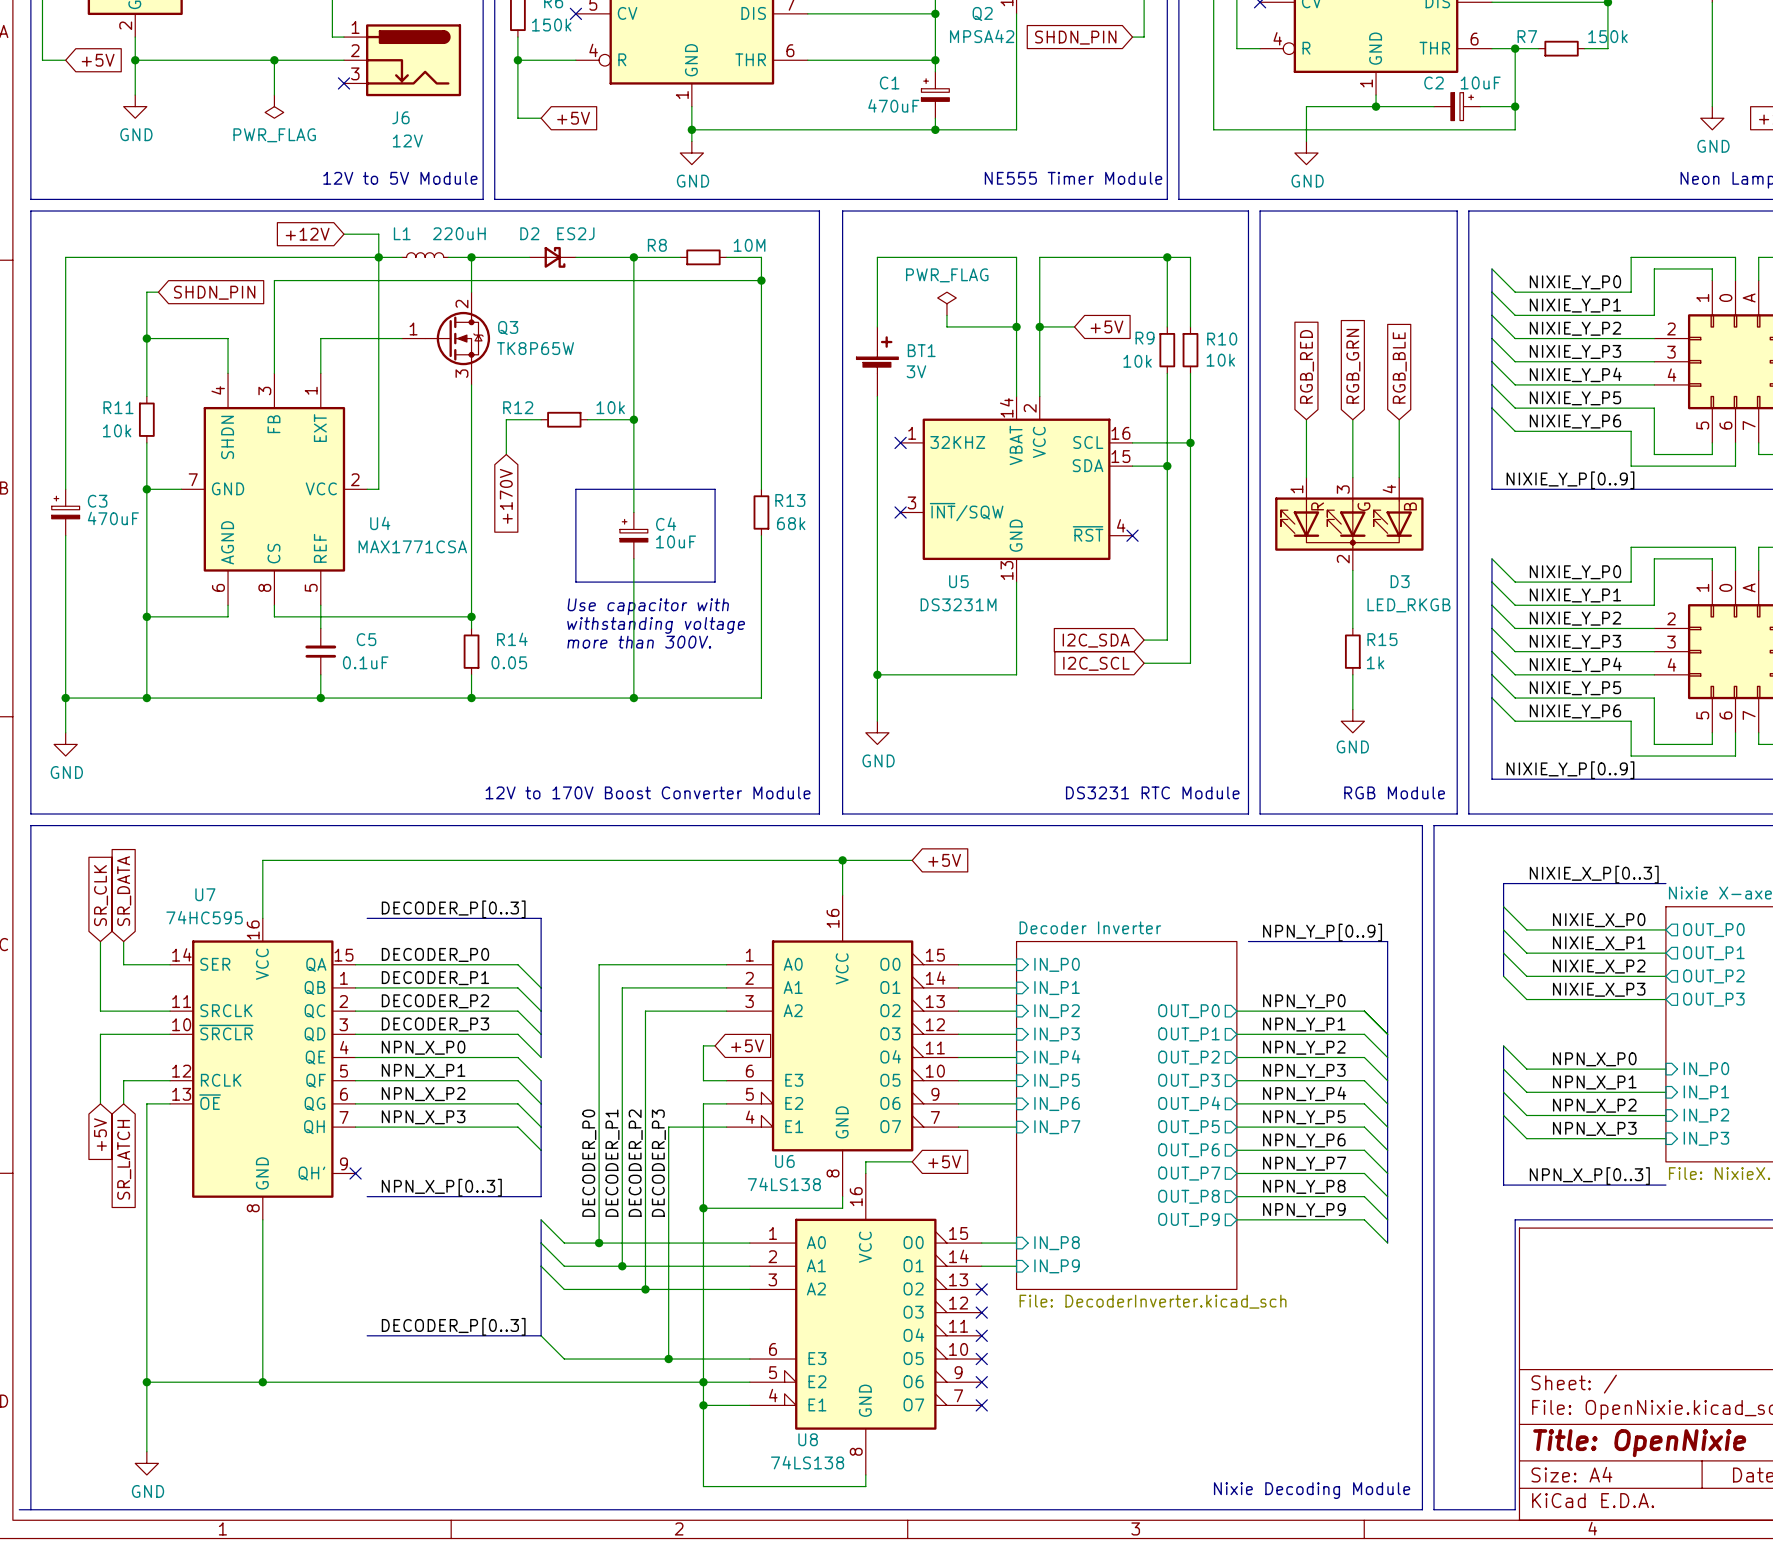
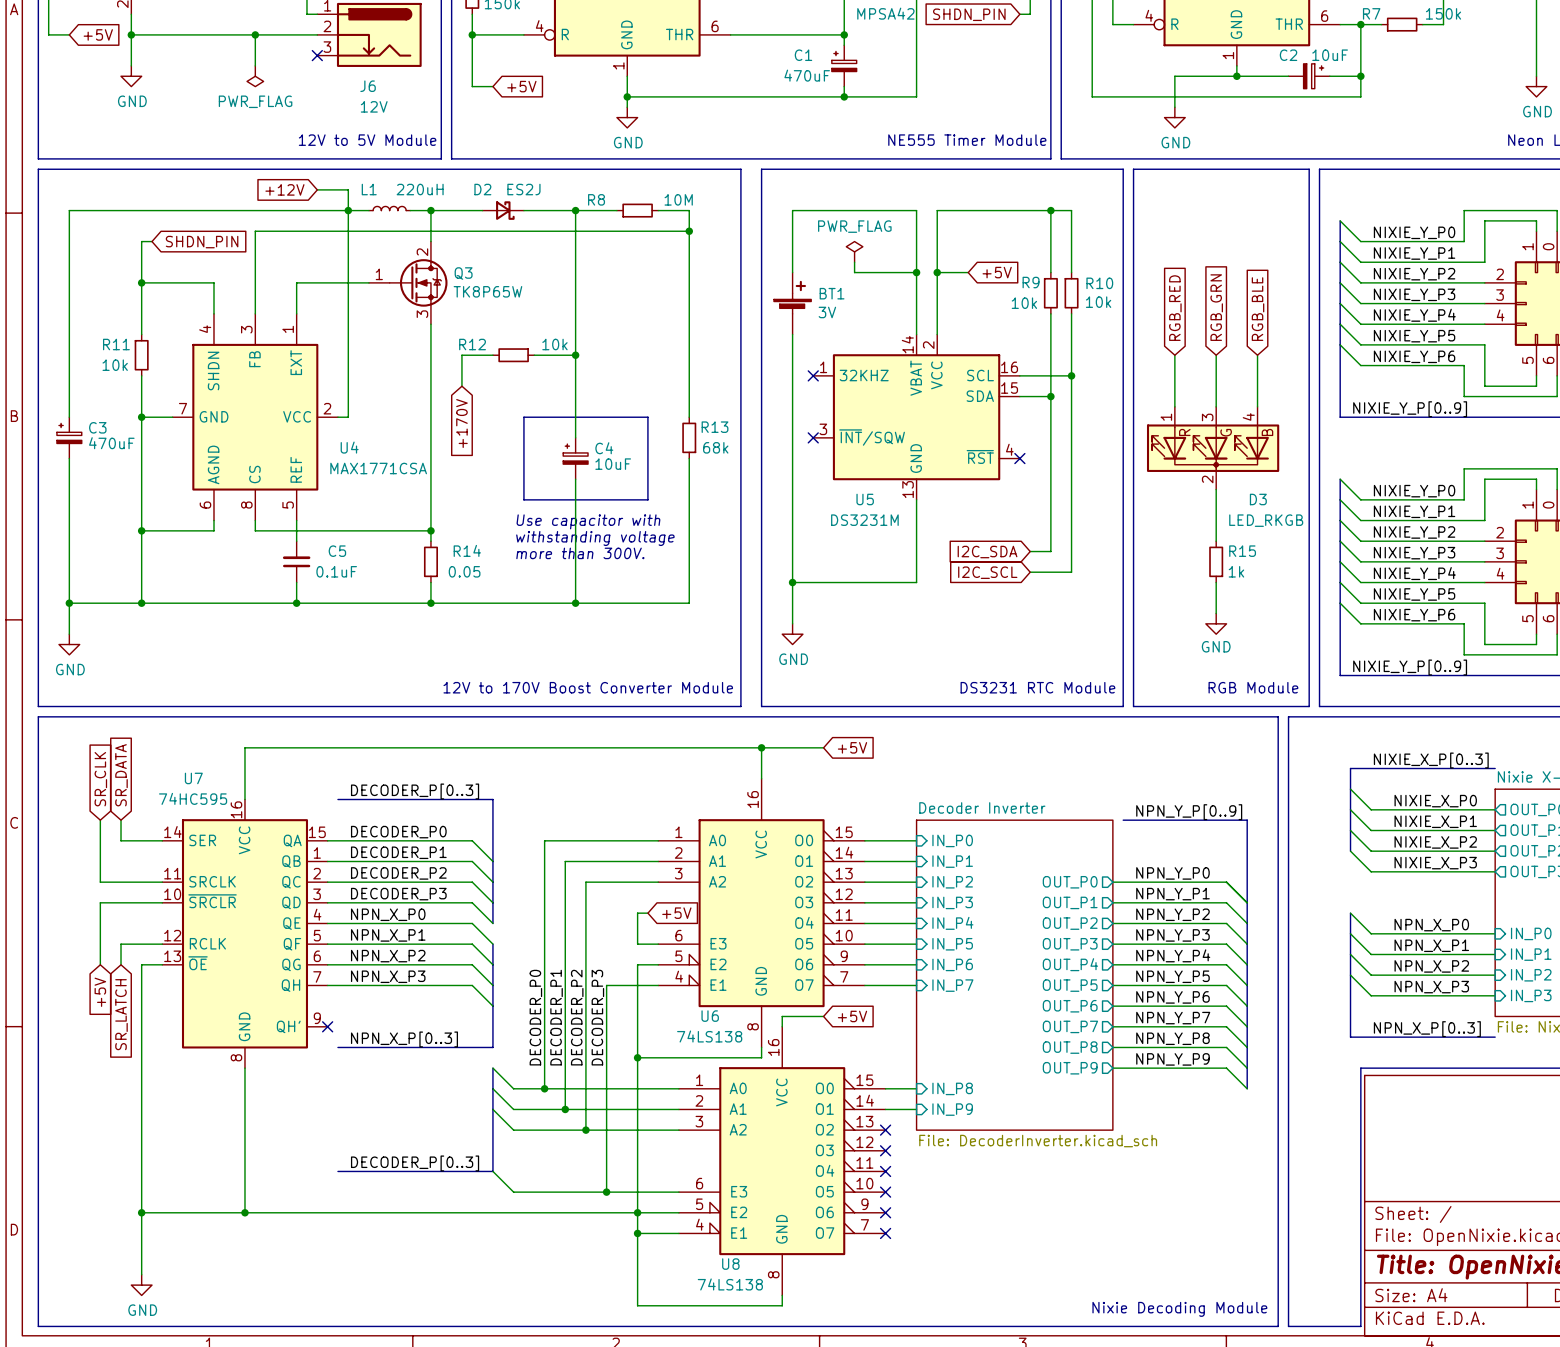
line: (19, 1509) (30, 1509) -> none

